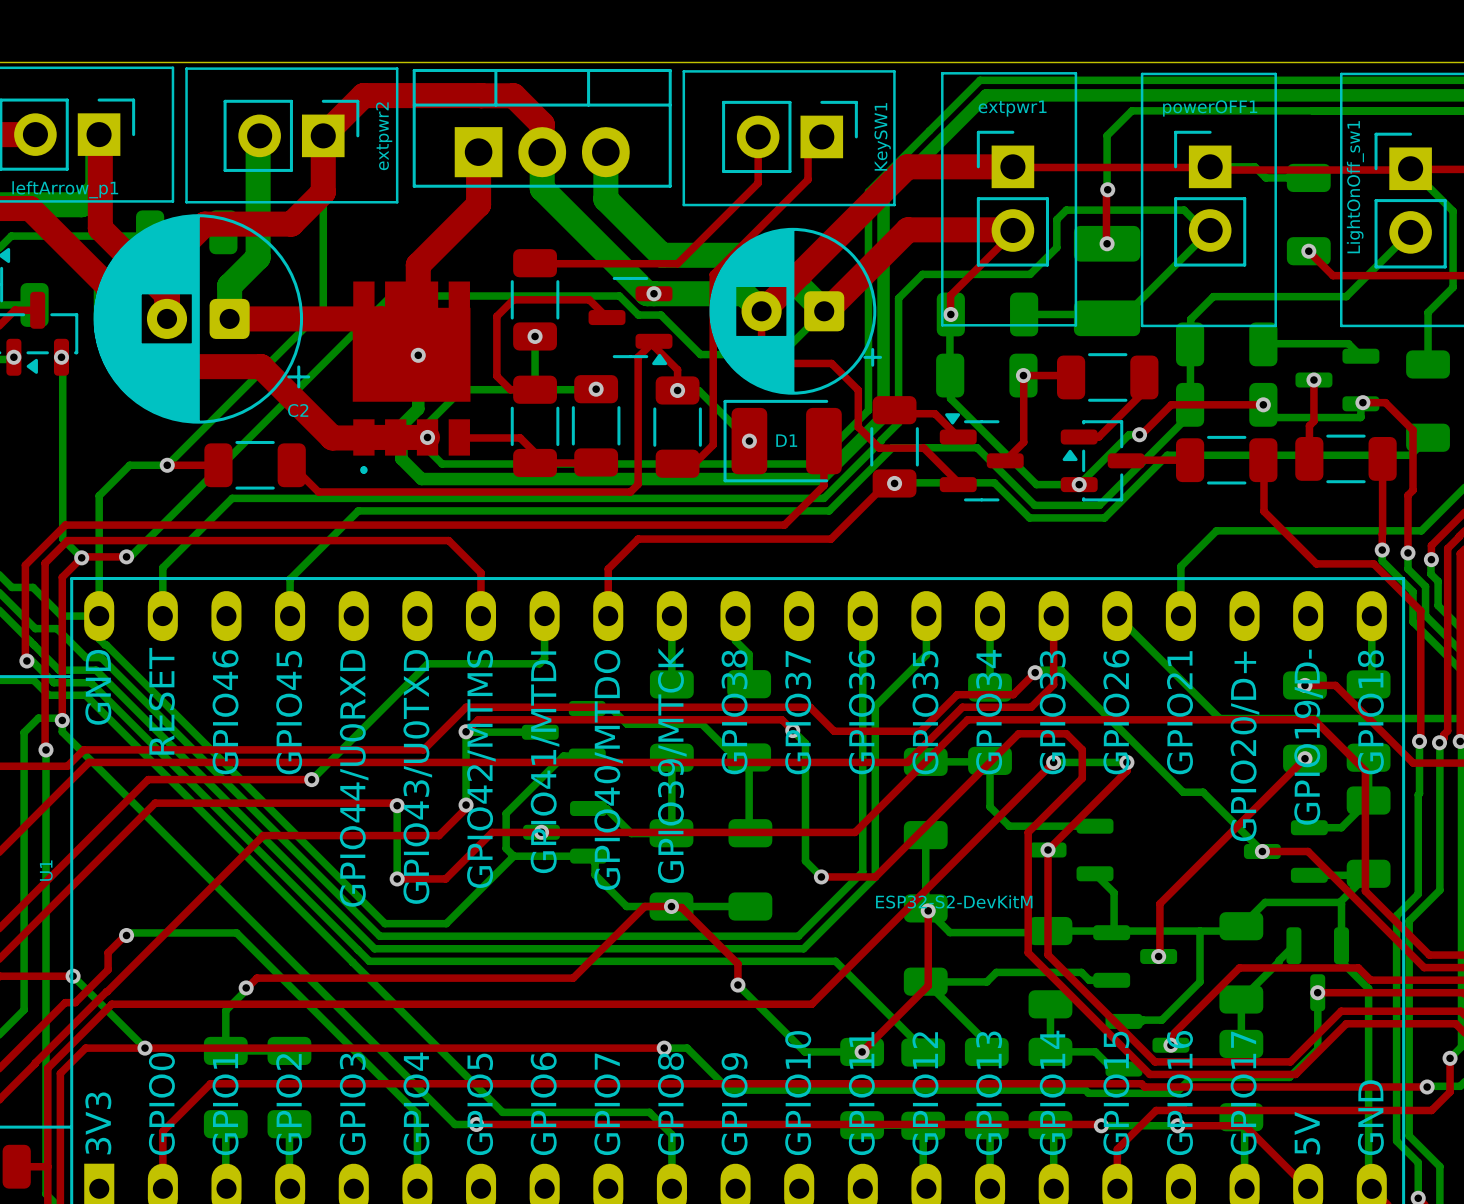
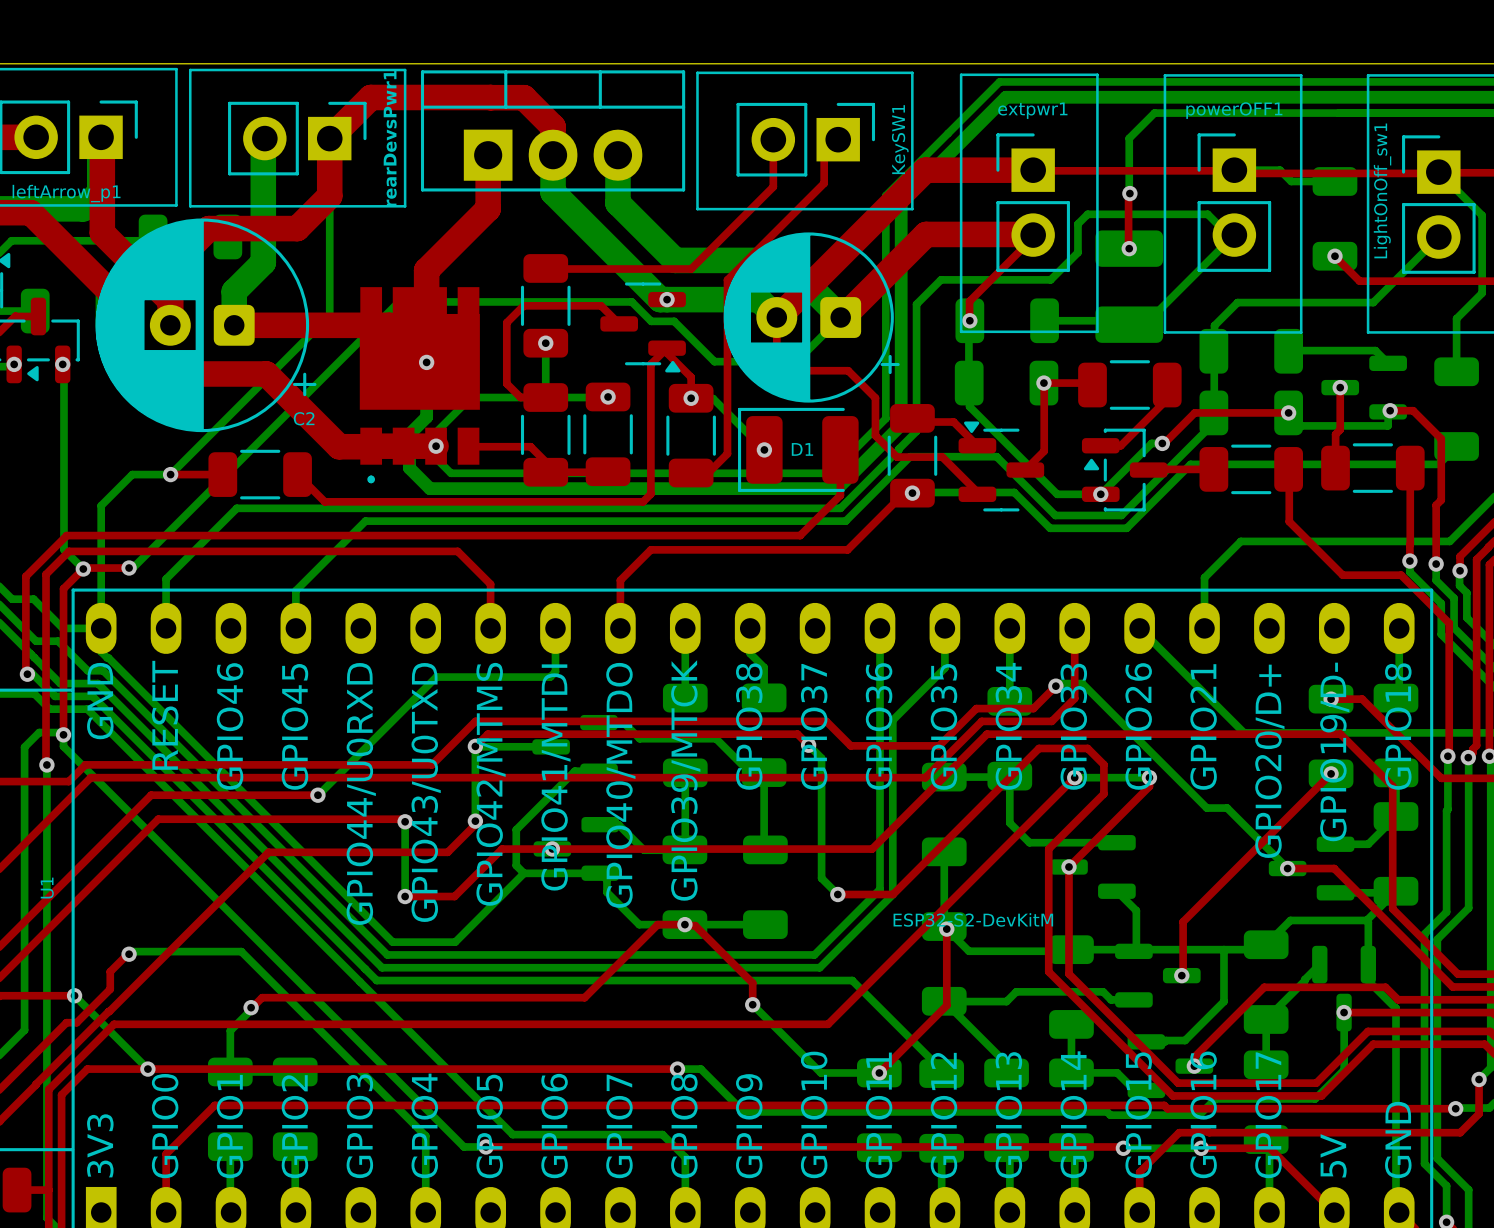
extpwr2 name: extpwr2 (384, 136) -> rearDevsPwr1 (390, 138)

